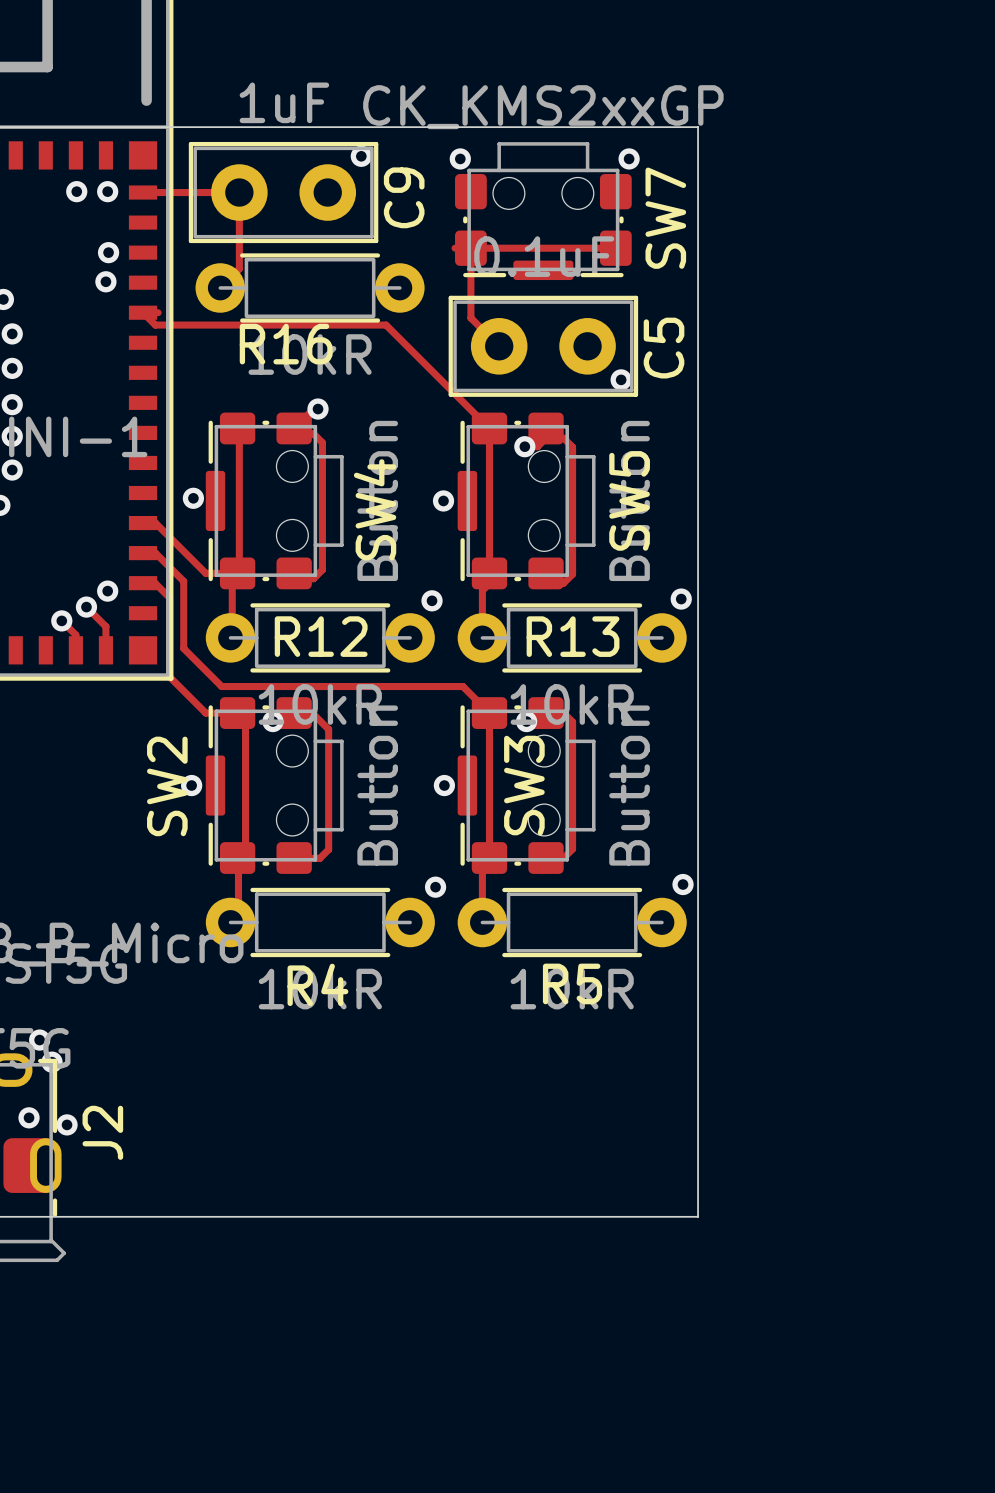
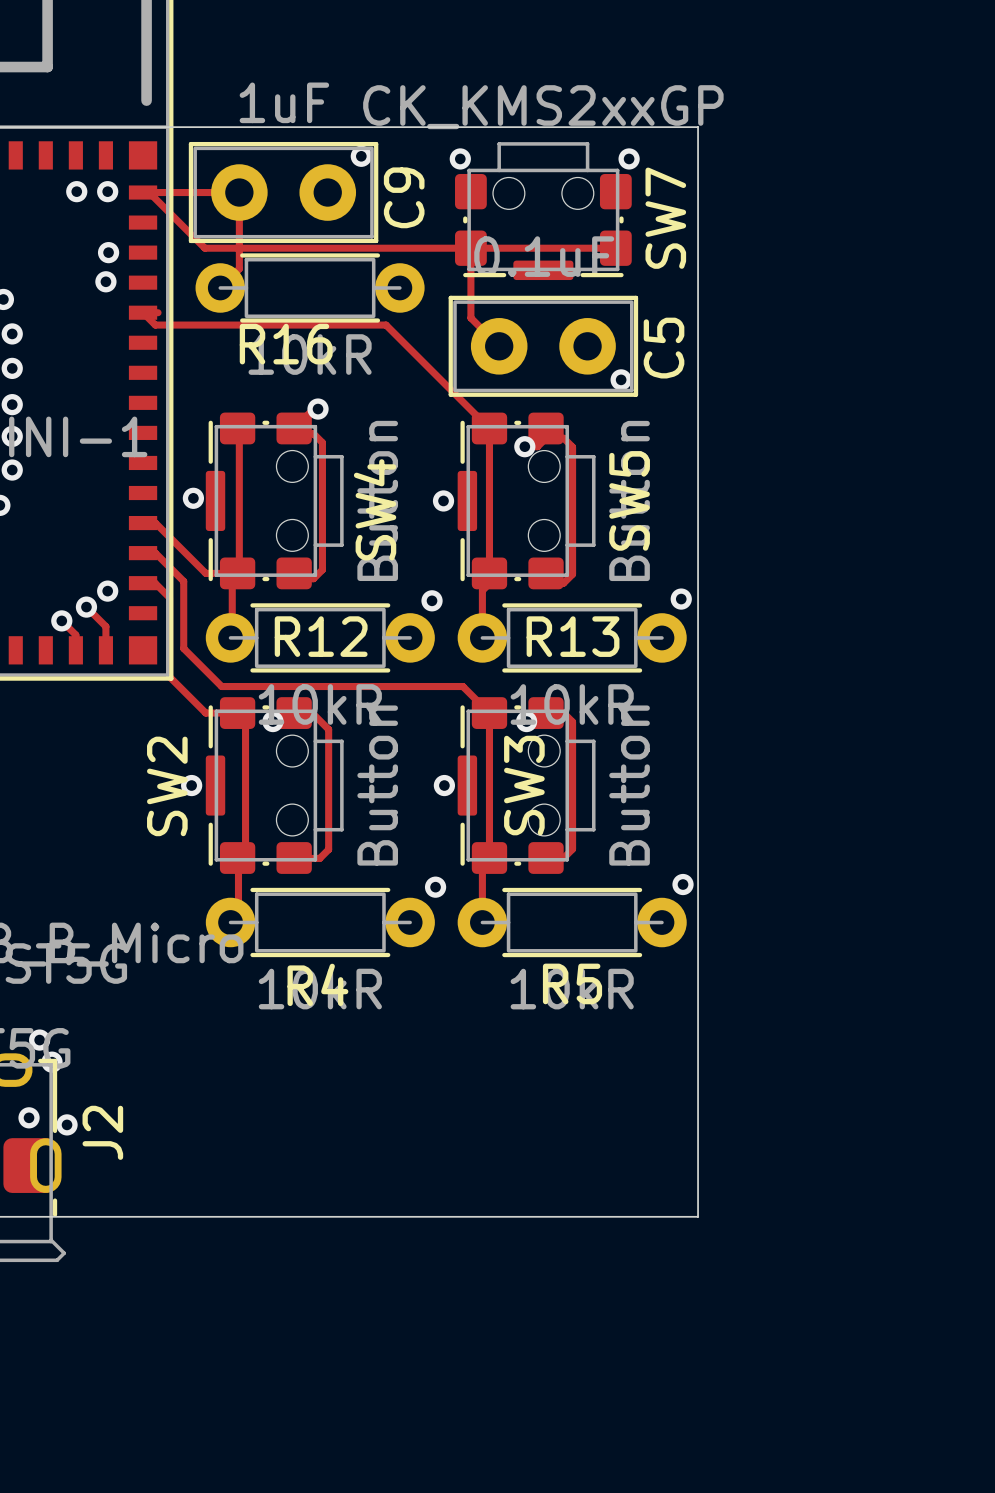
track: none -> (149, 192) (204, 248) (455, 248)

